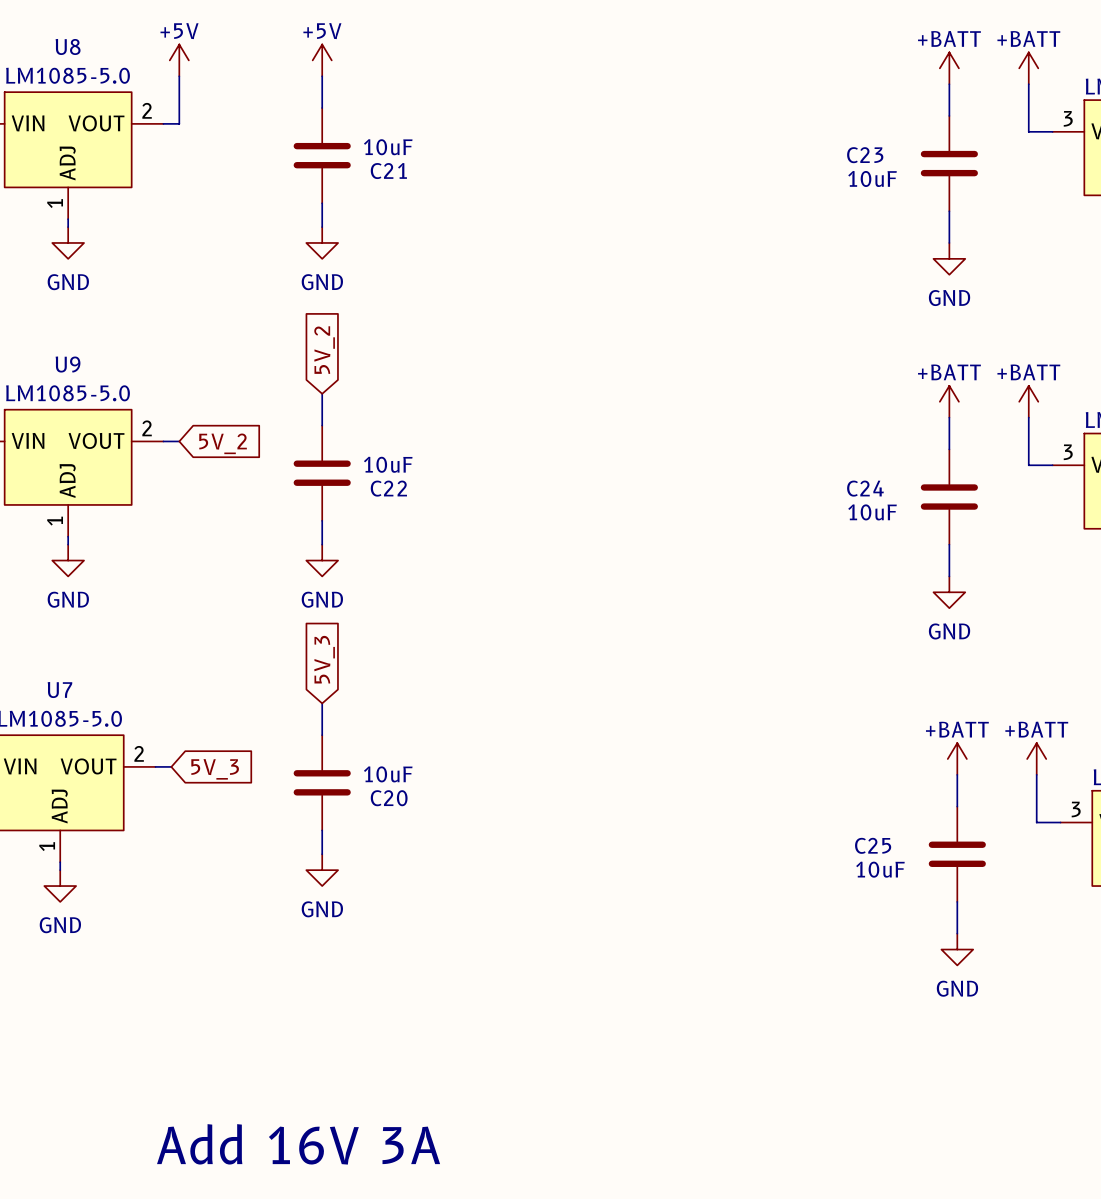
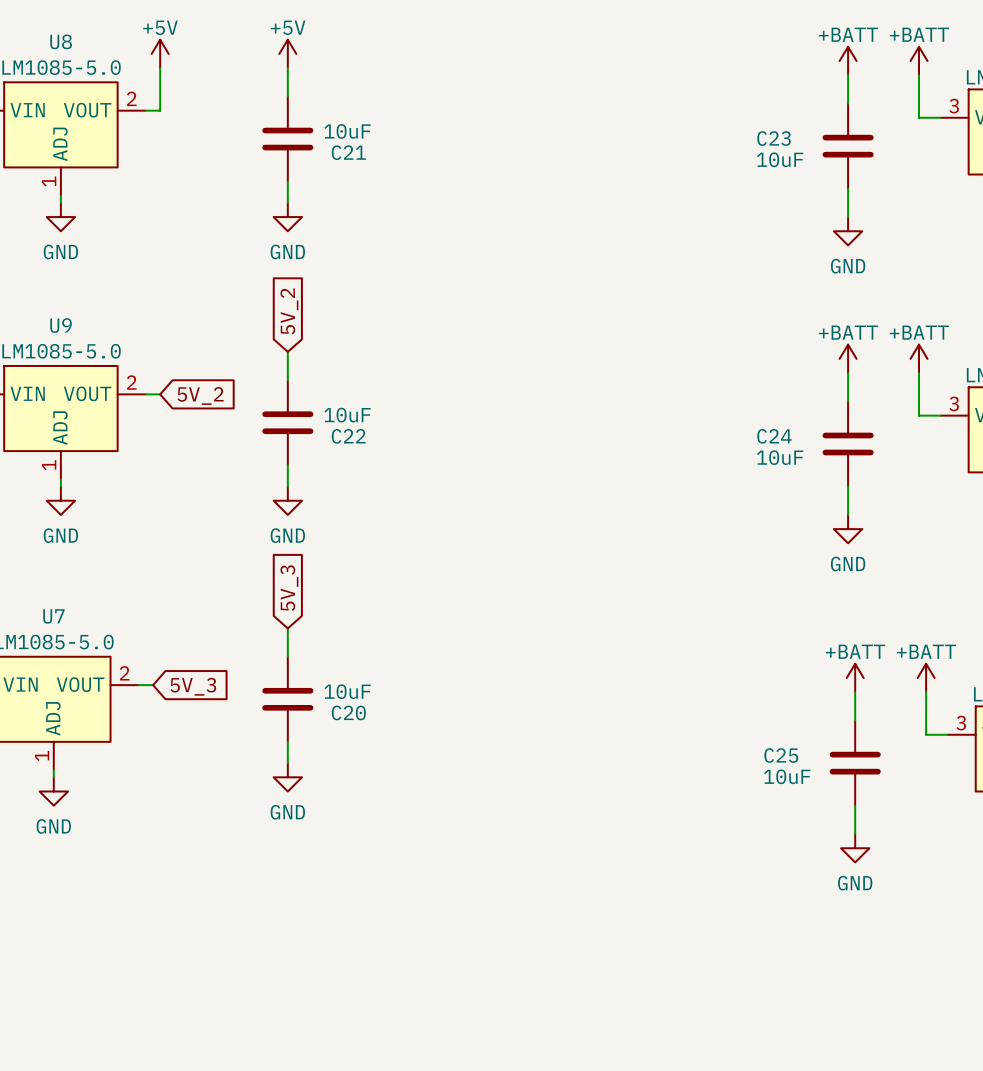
text: Add 16V 3A (298, 1144) -> none

